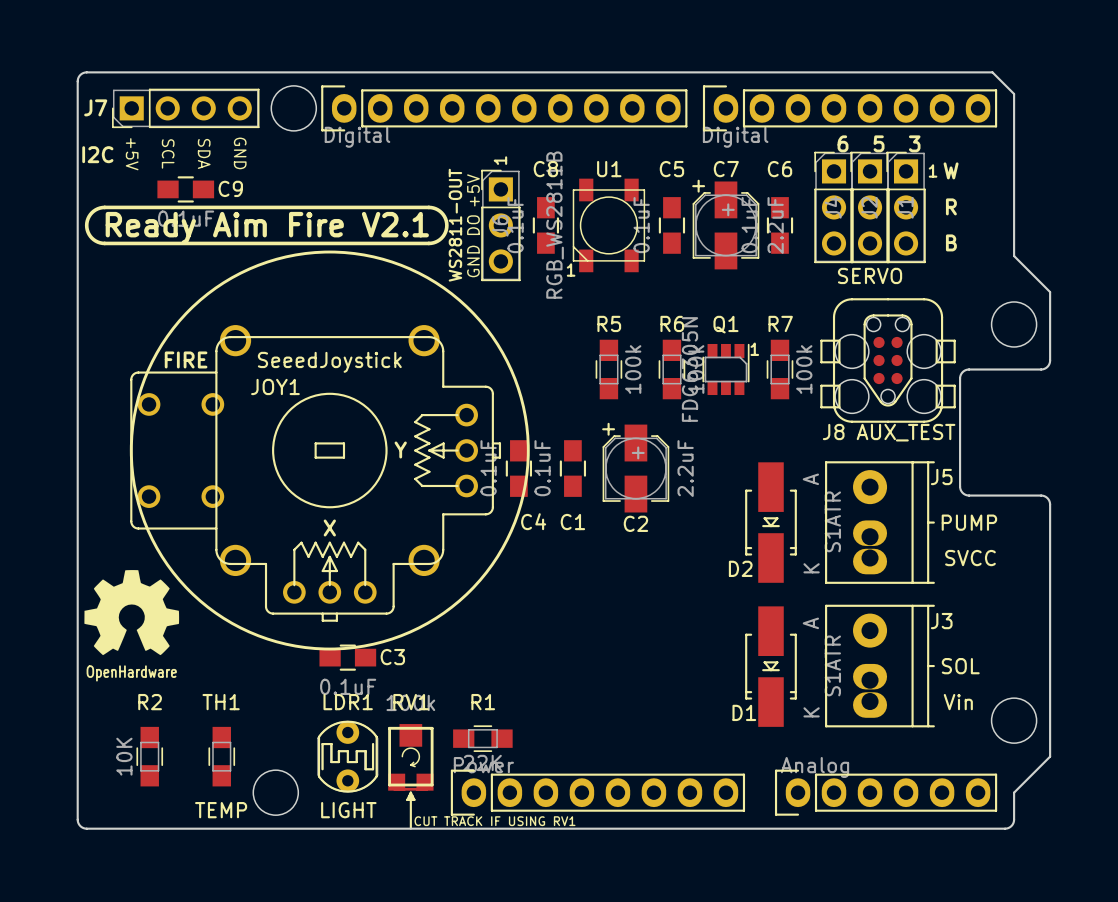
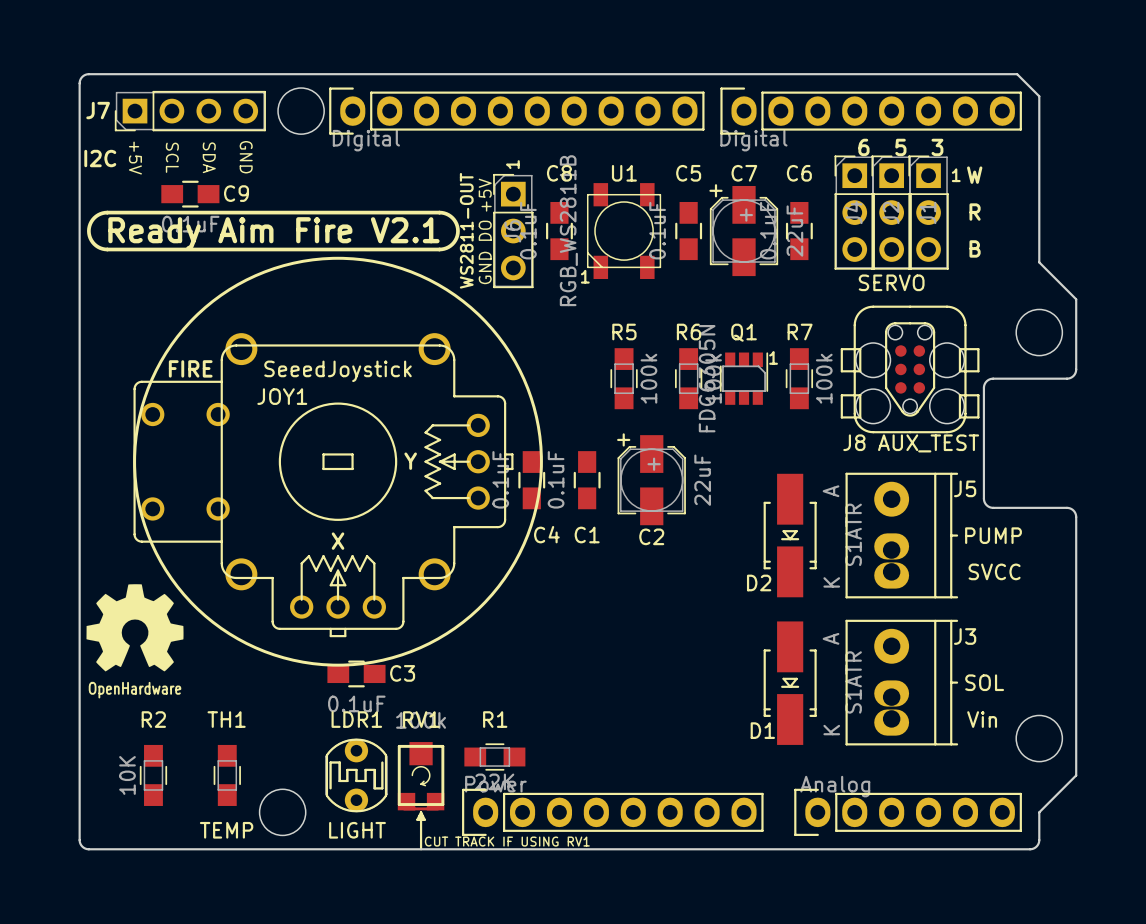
C7 value: 2.2uF (775, 225) -> 22uF (794, 231)
C2 value: 2.2uF (685, 468) -> 22uF (702, 480)

